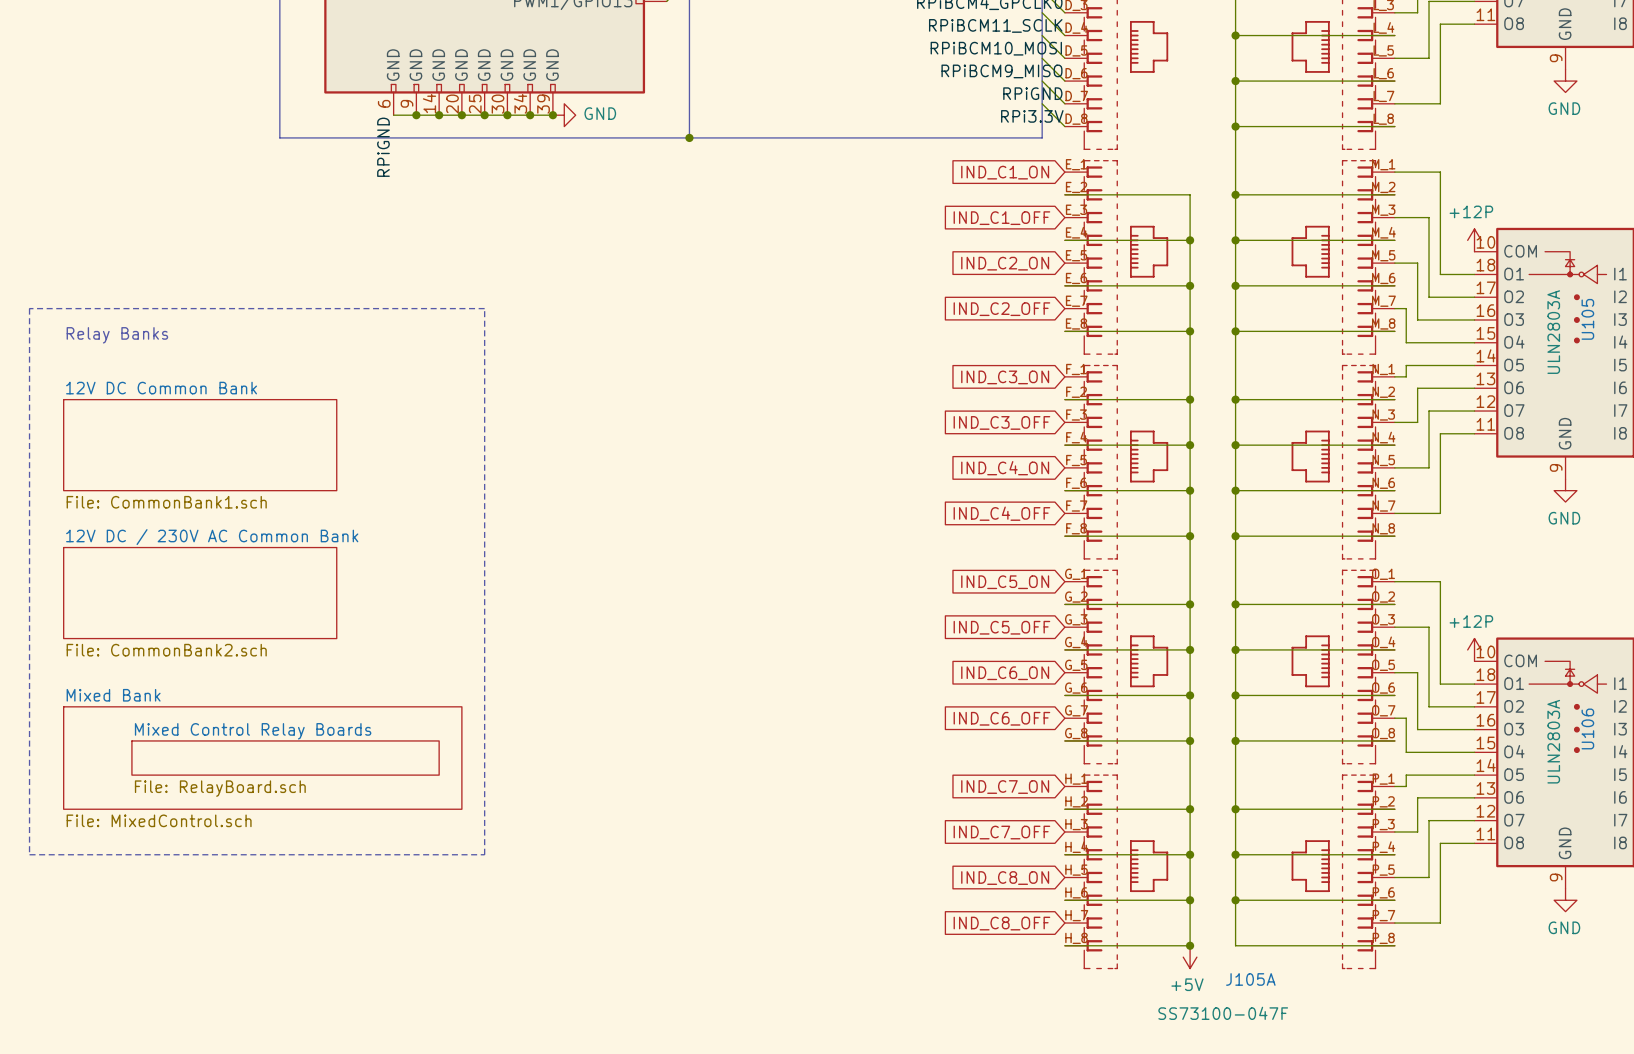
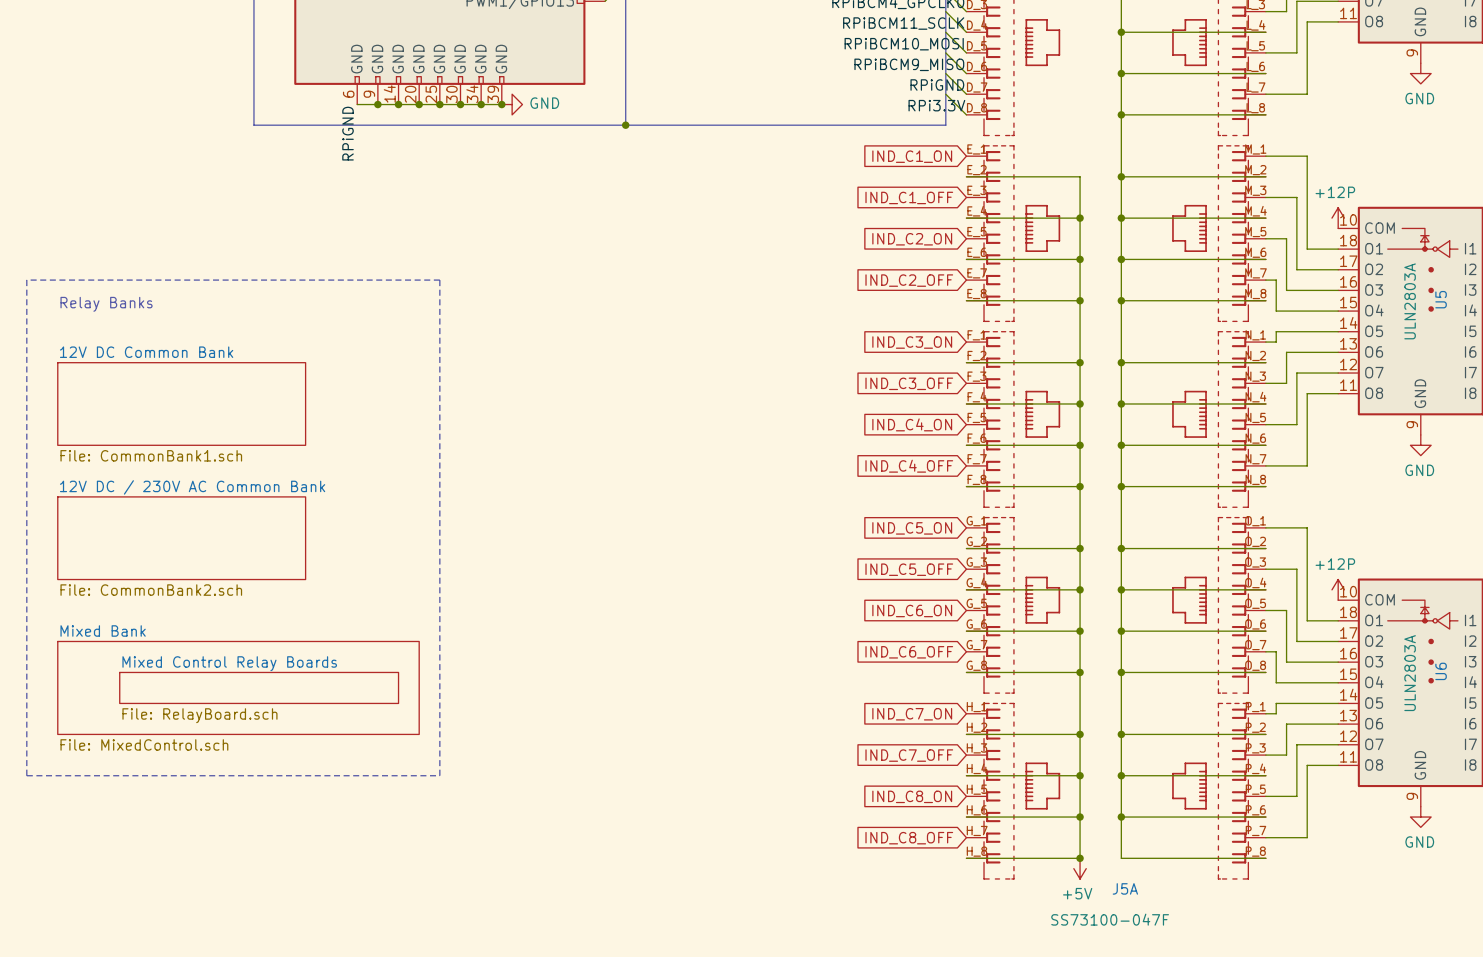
U105 name: U105 (1587, 319) -> U5 (1441, 299)
U106 name: U106 (1587, 728) -> U6 (1441, 671)
J105A name: J105A (1250, 979) -> J5A (1125, 888)

